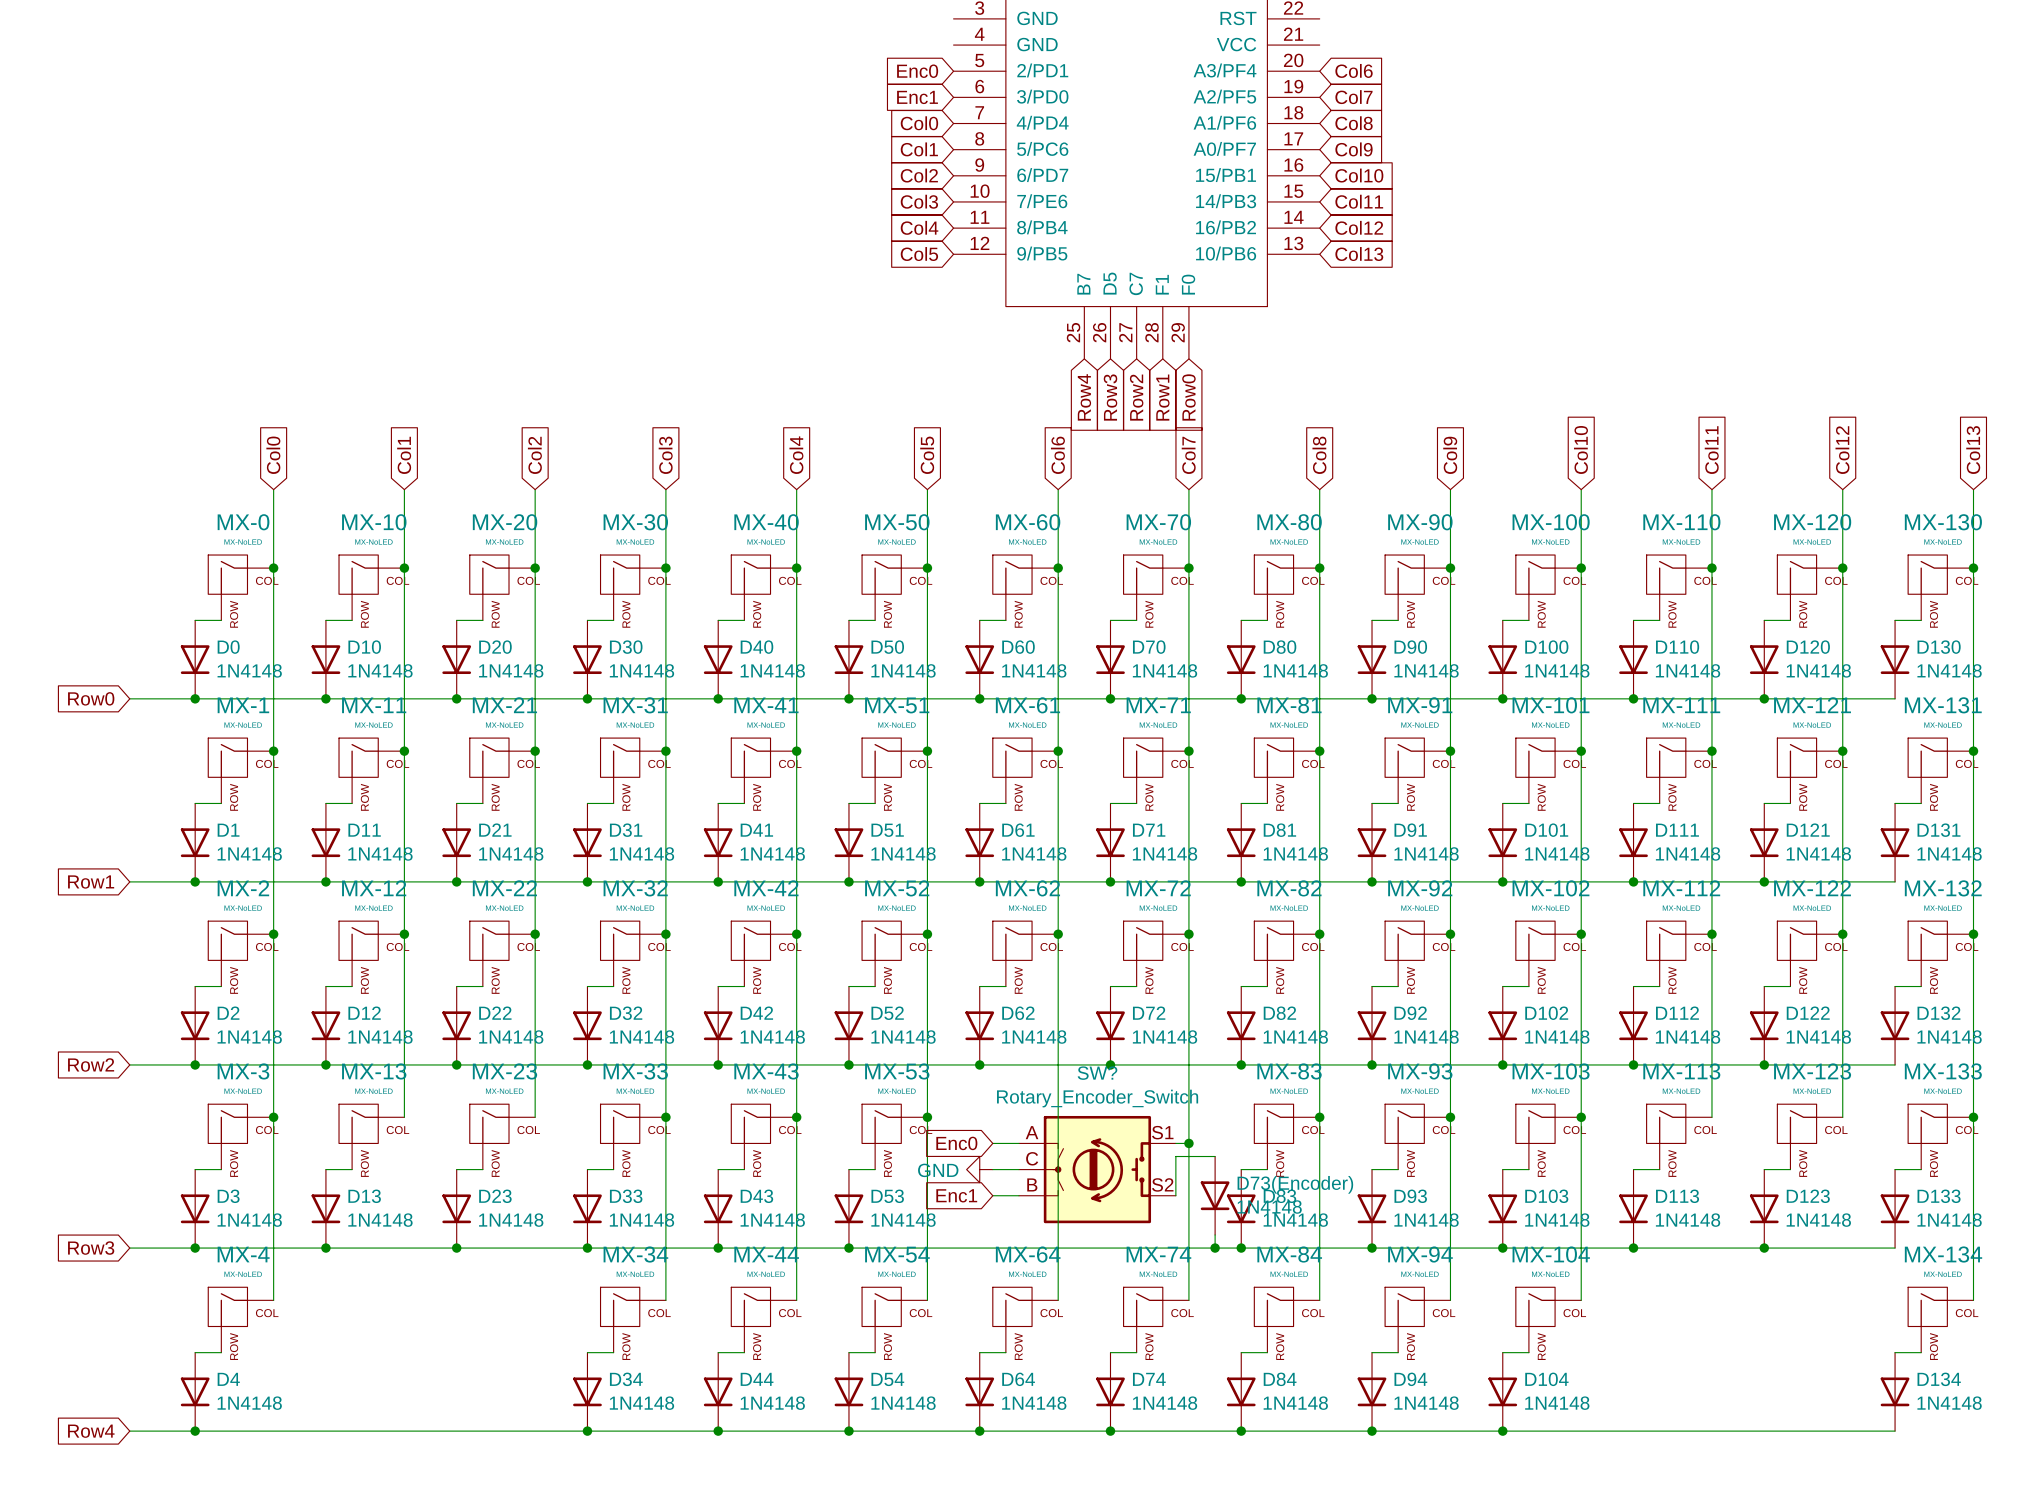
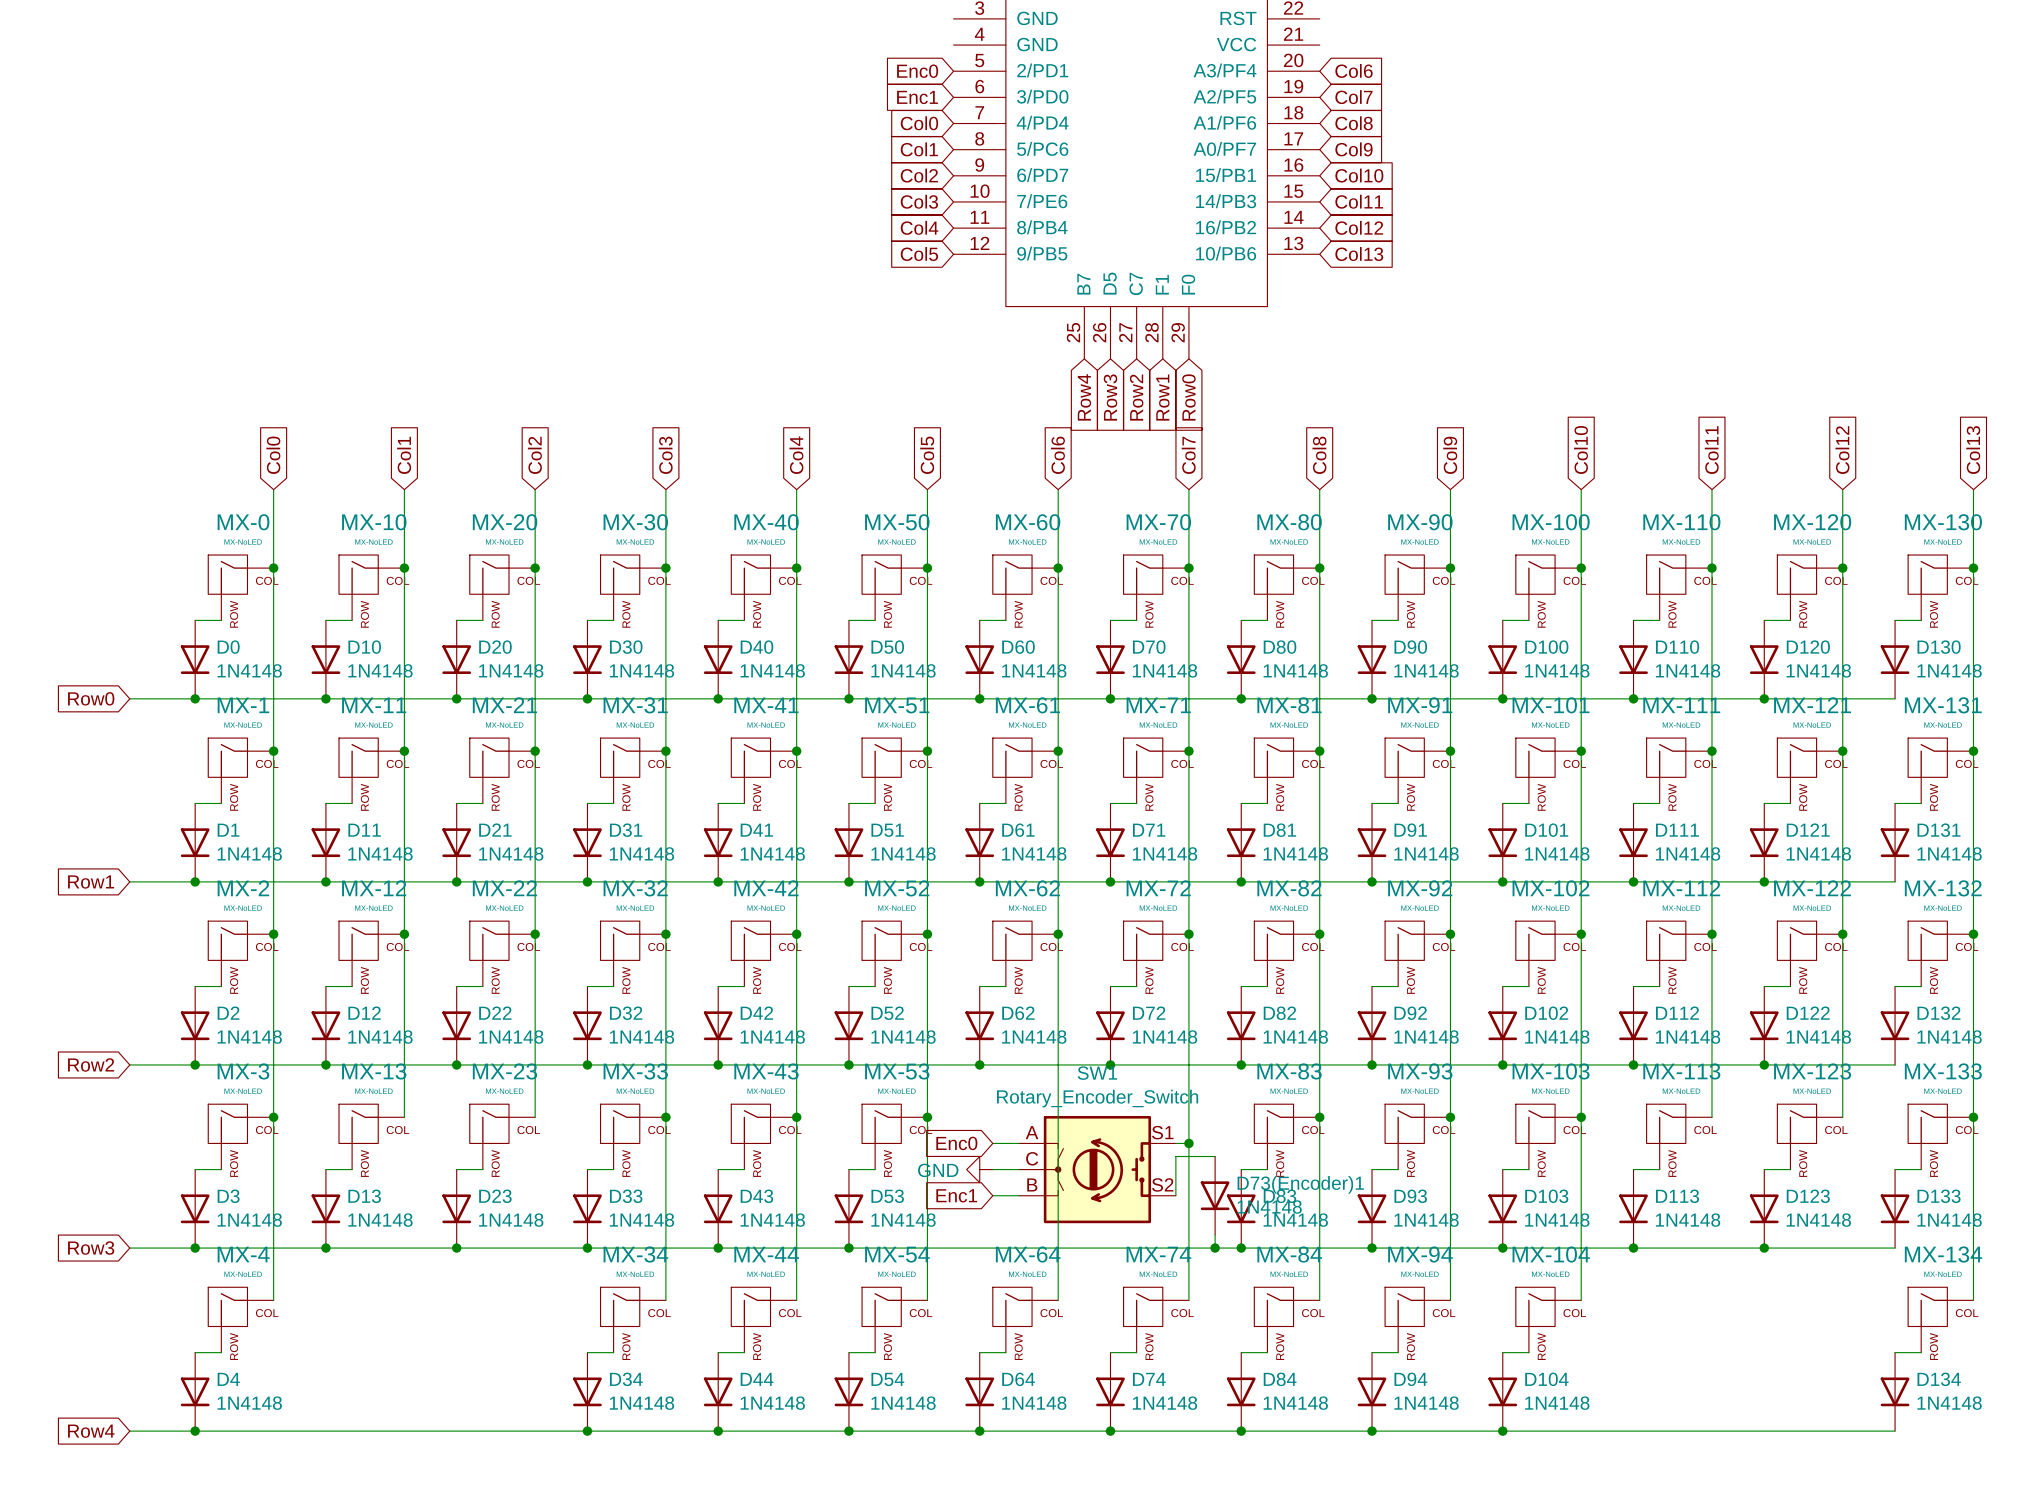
SW? name: SW? (1097, 1073) -> SW1 (1097, 1073)
D73(Encoder) name: D73(Encoder) (1295, 1184) -> D73(Encoder)1 (1300, 1184)

